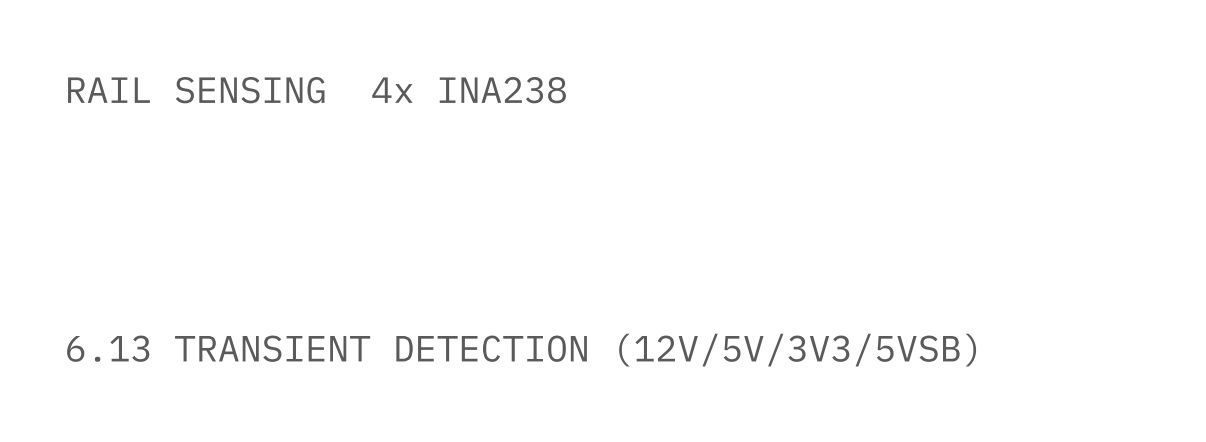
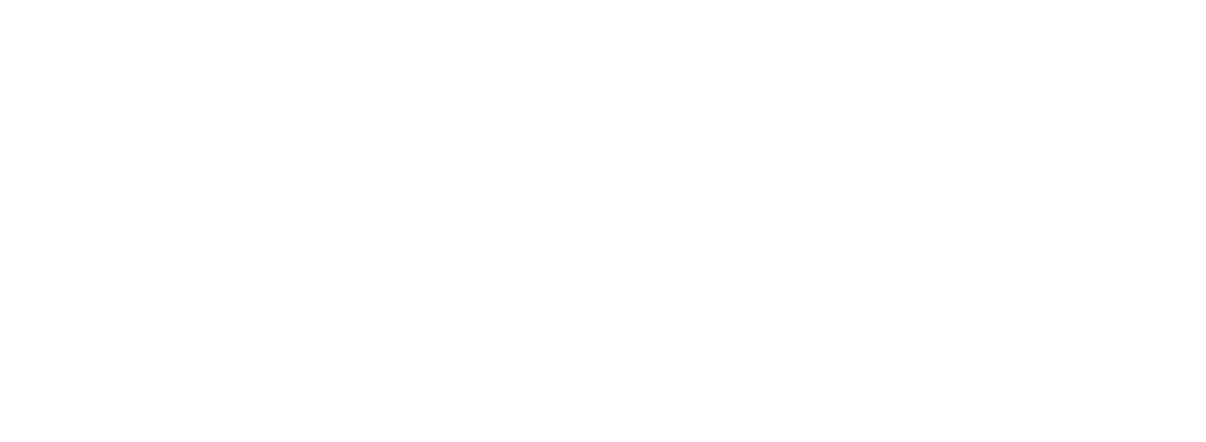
text: RAIL SENSING 4x INA238 (316, 90) -> none
text: 6.13 TRANSIENT DETECTION (12V/5V/3V3/5VSB) (521, 350) -> none

